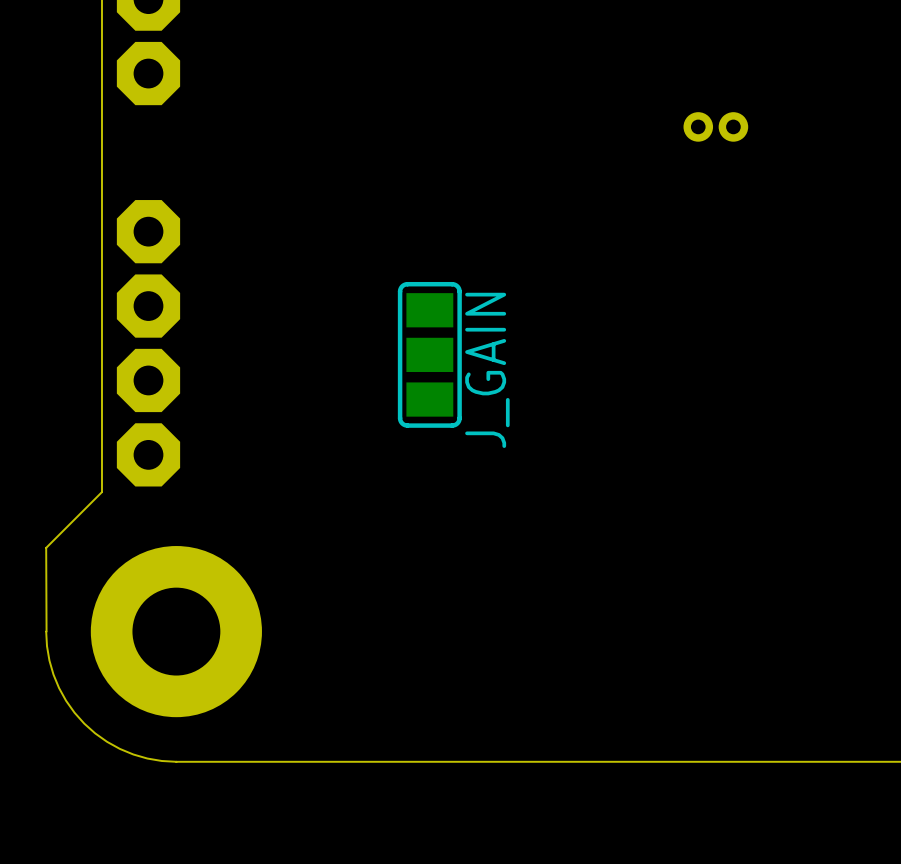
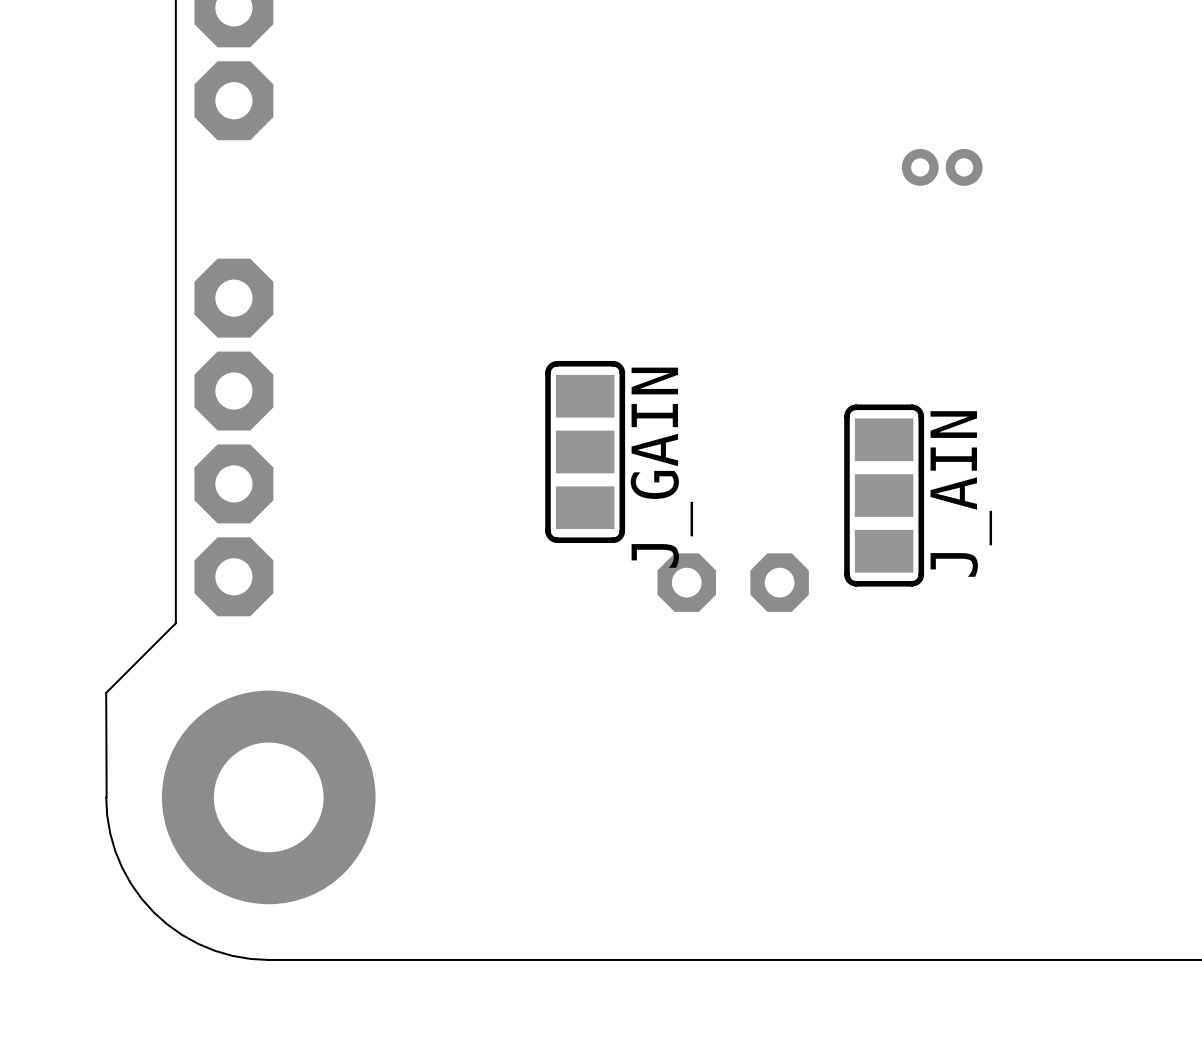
J_AIN: none -> (884, 495)
part: none -> (686, 582)
part: none -> (779, 582)

